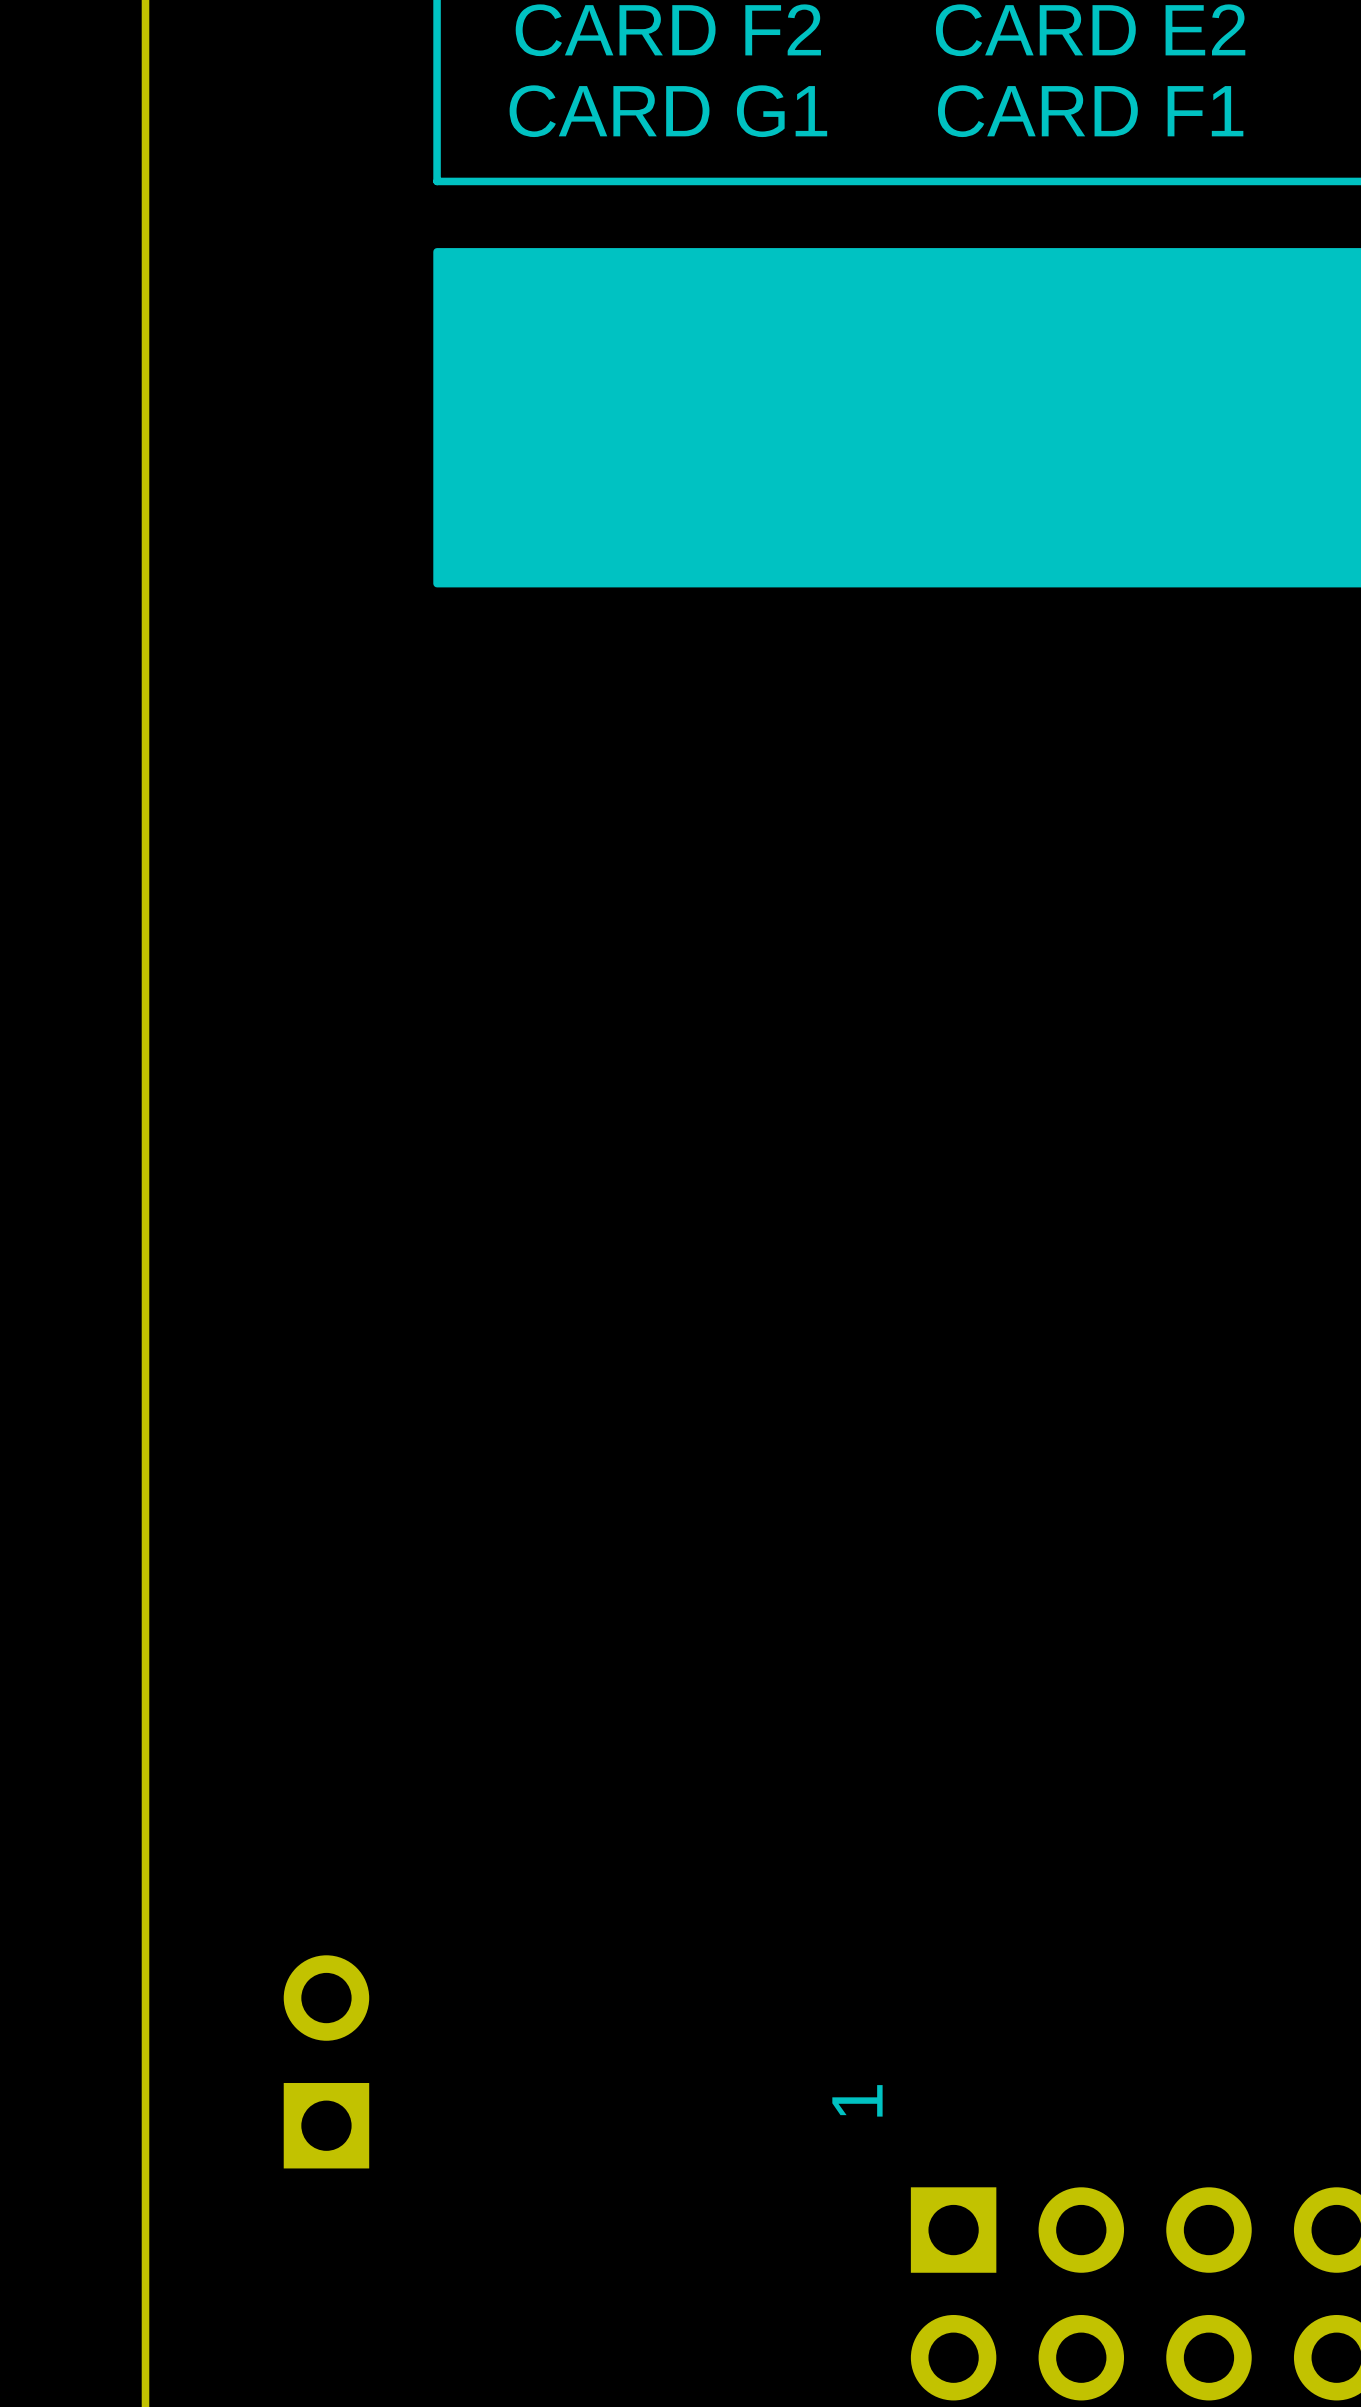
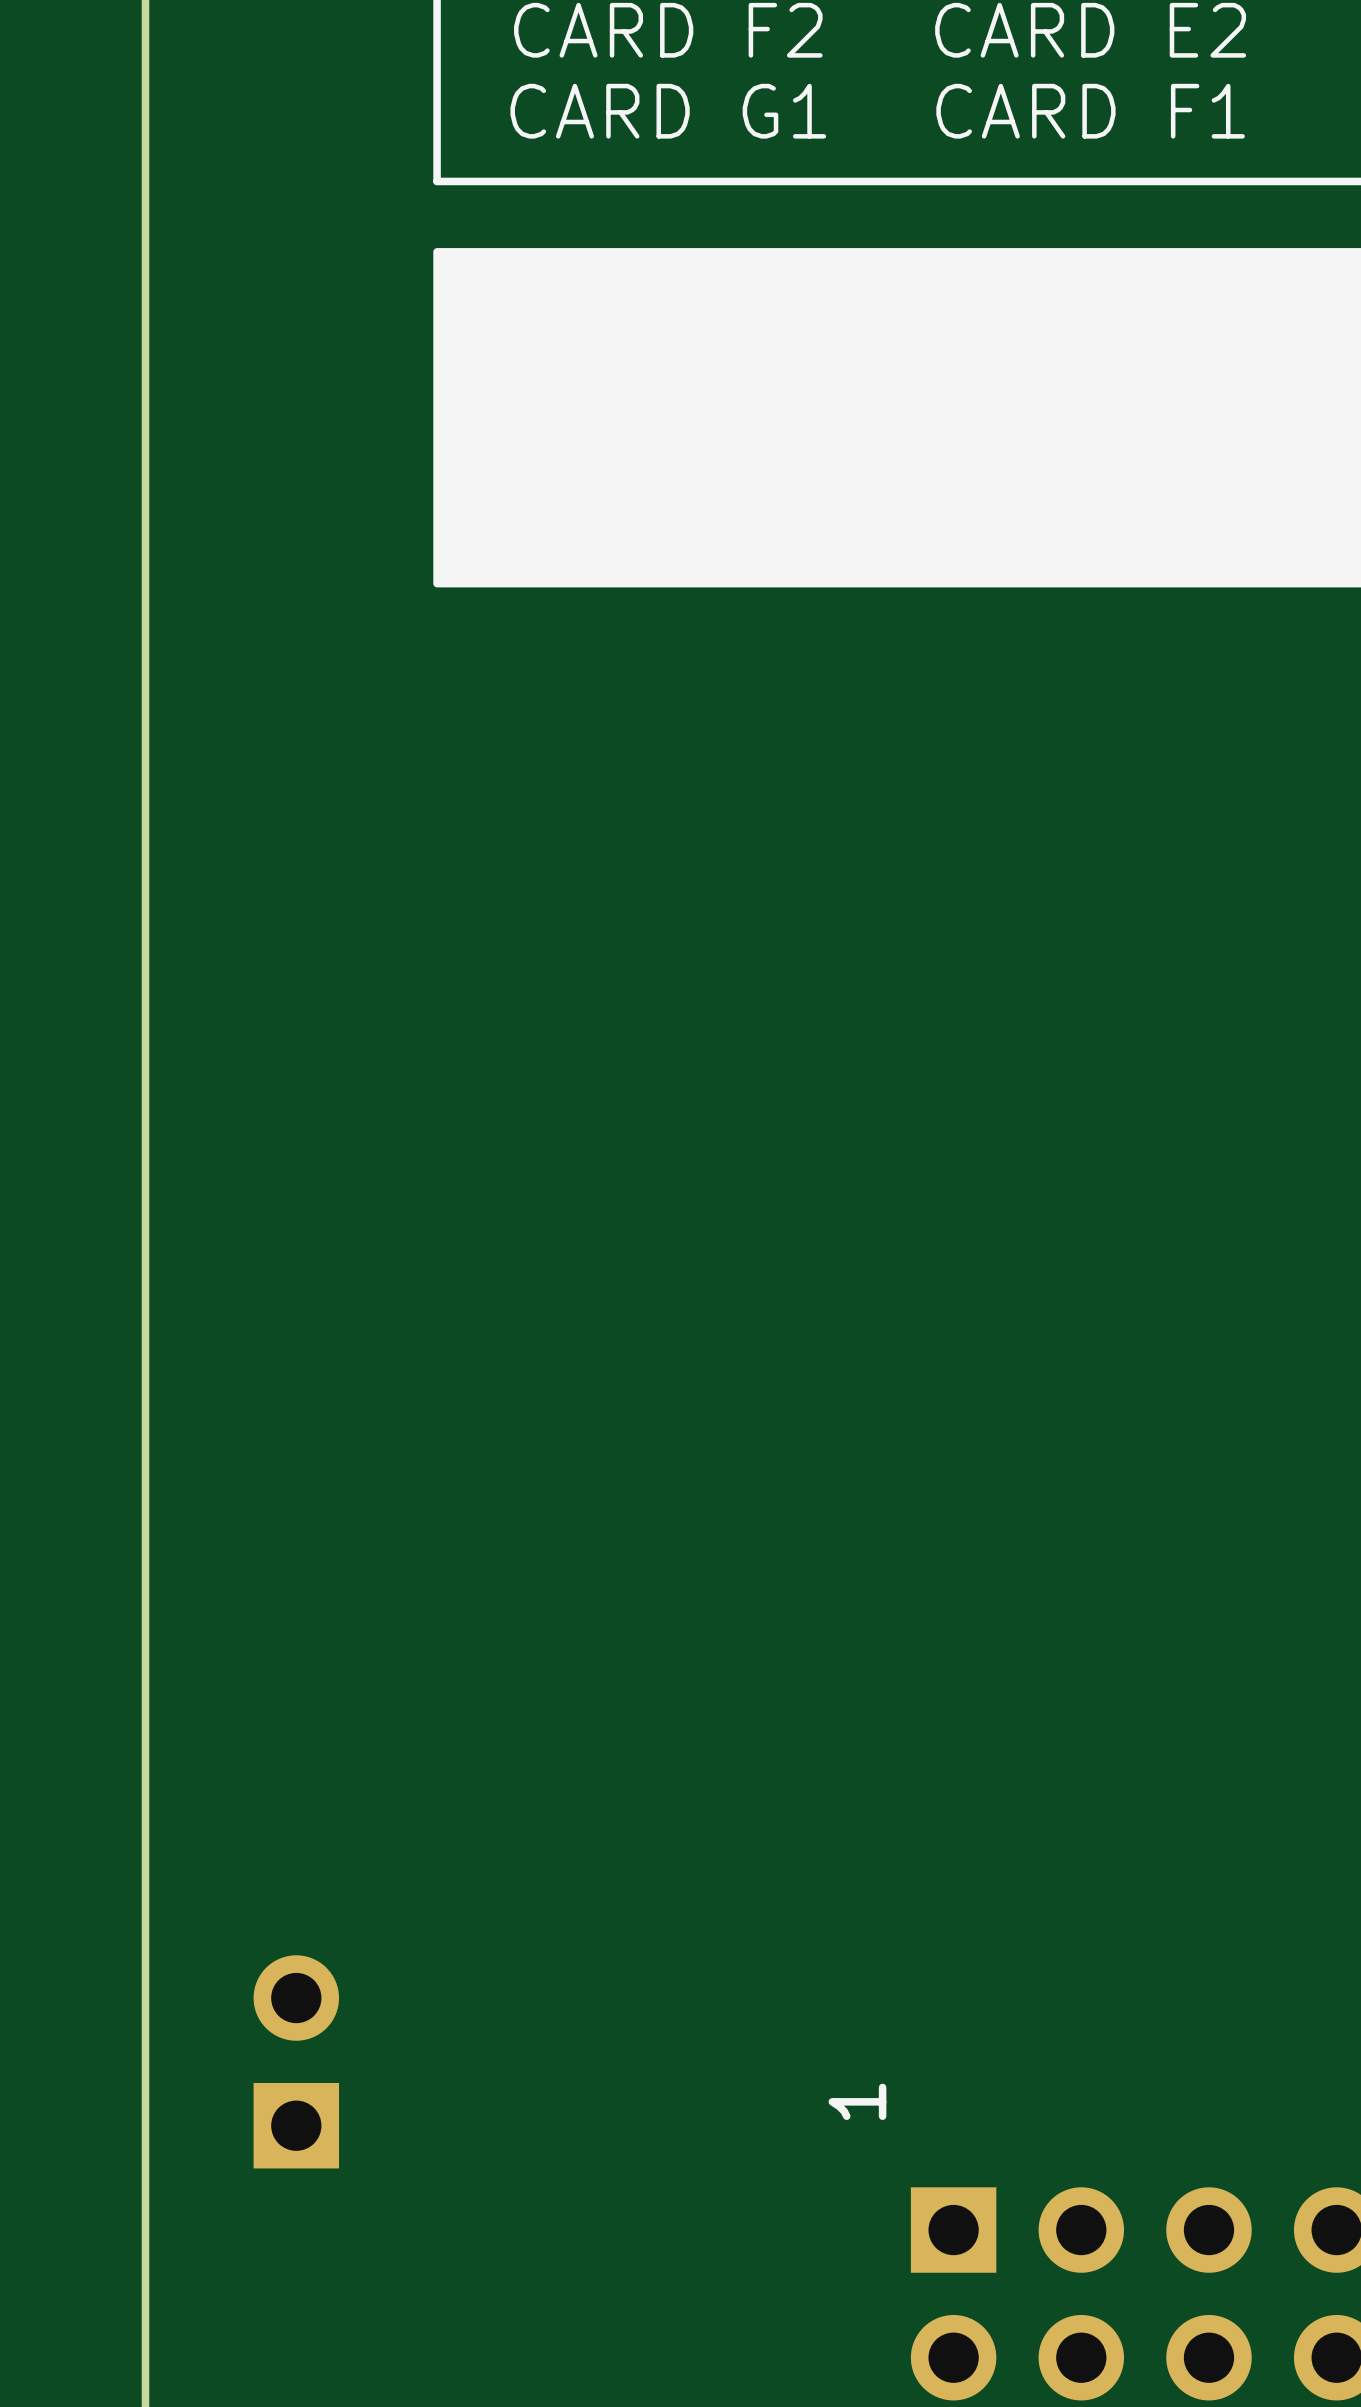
part position: (326, 2061) -> (296, 2061)

